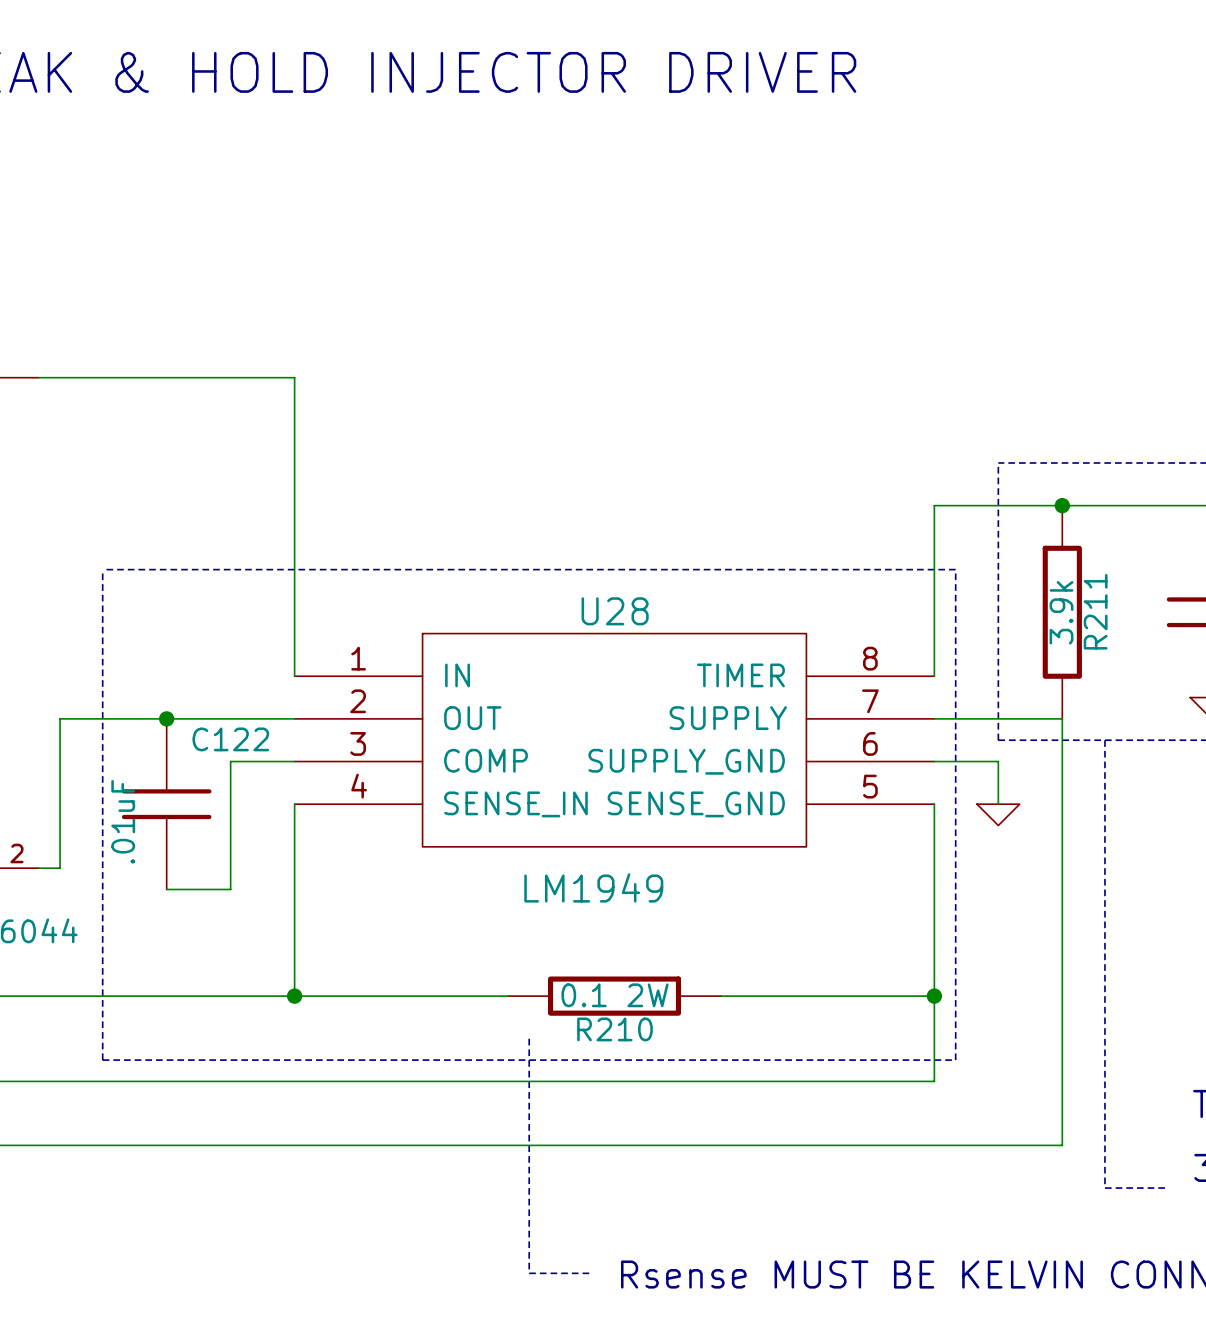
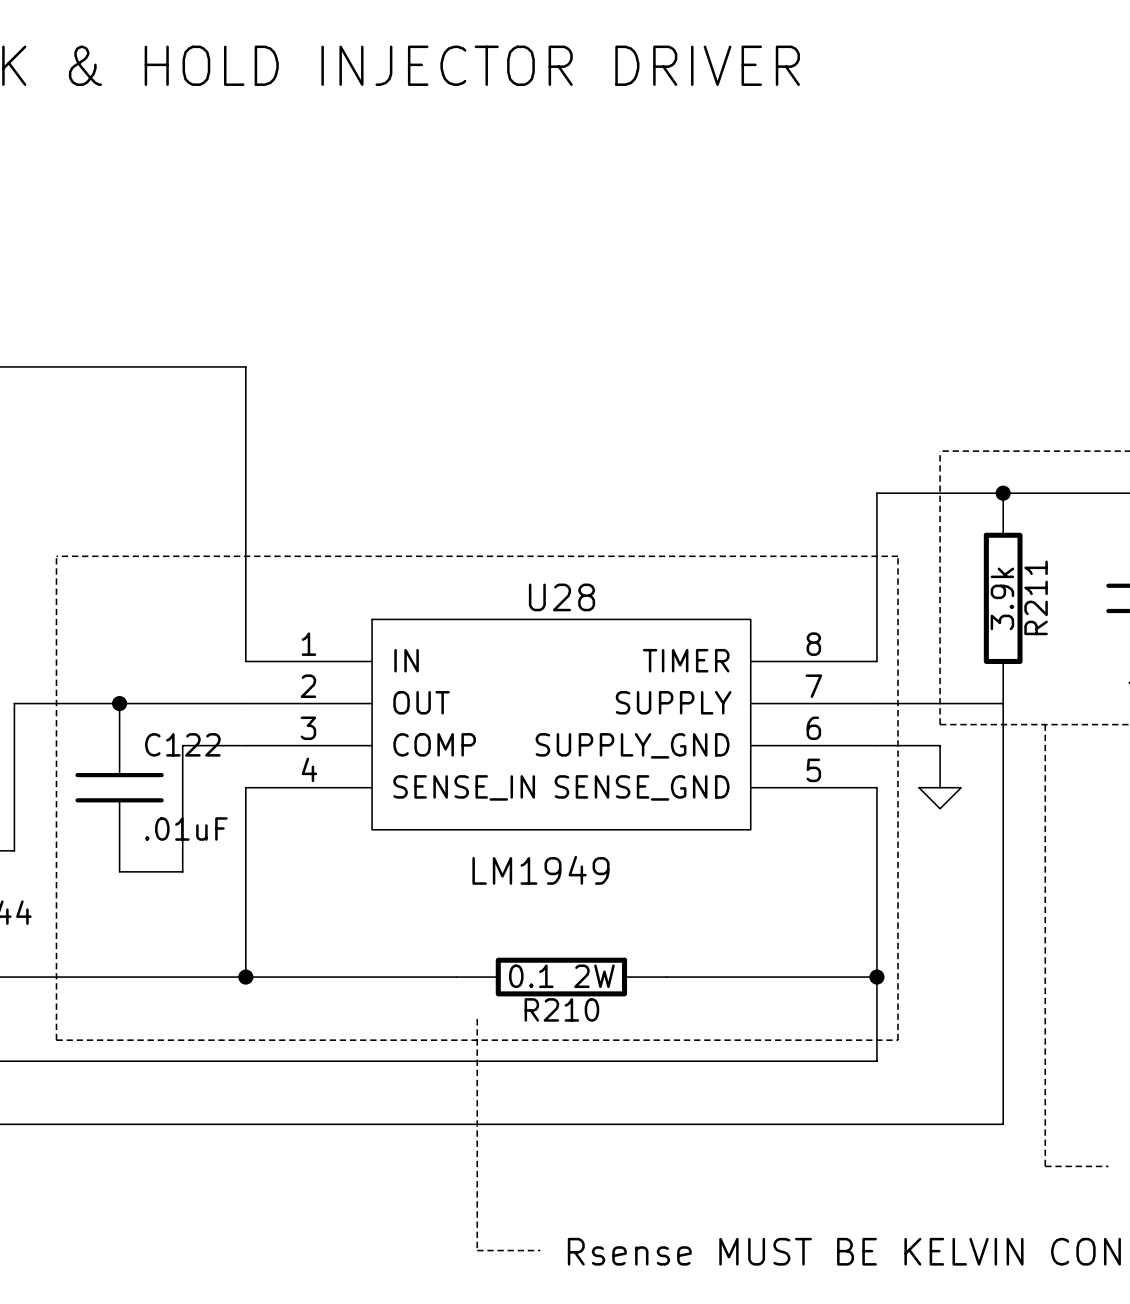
C122 name position: C122 (230, 739) -> C122 (182, 744)
C122 value rotation: 0° (123, 821) -> 90° clockwise (186, 829)
C122 value position: .01uF (123, 821) -> .01uF (186, 829)

